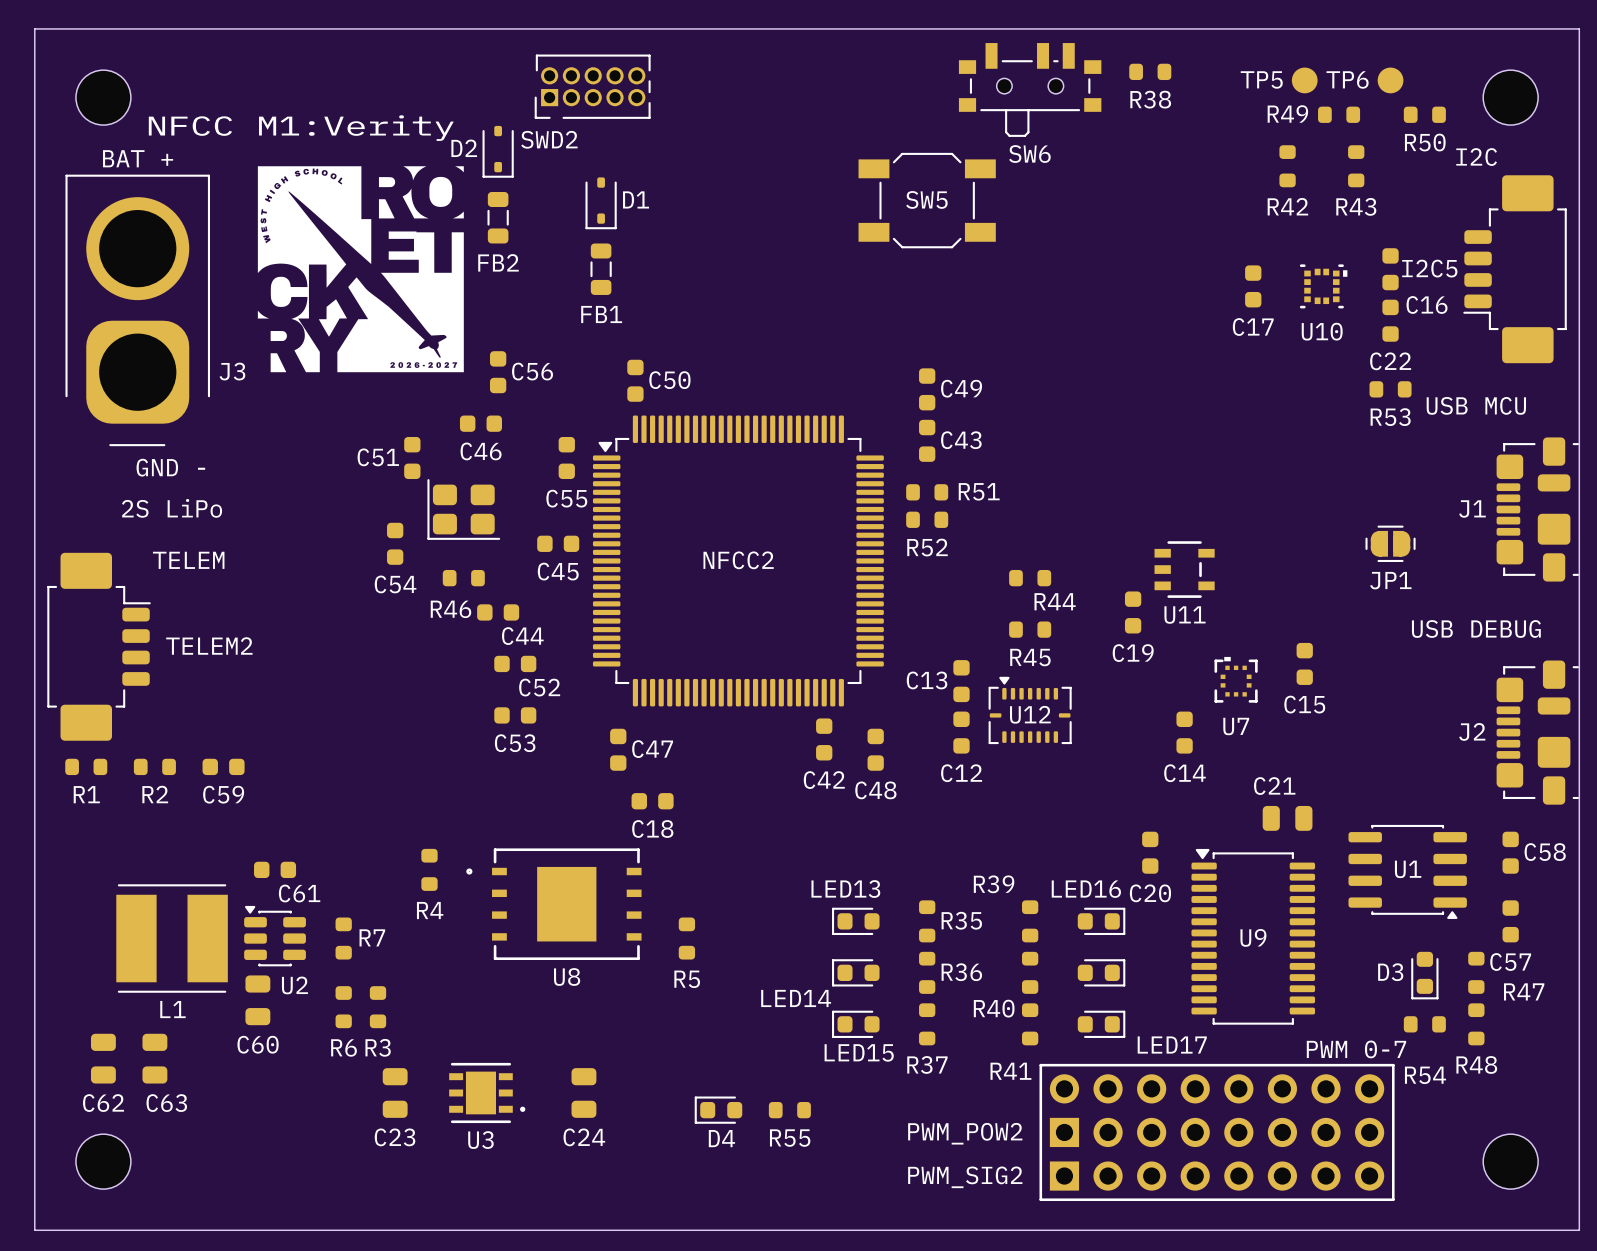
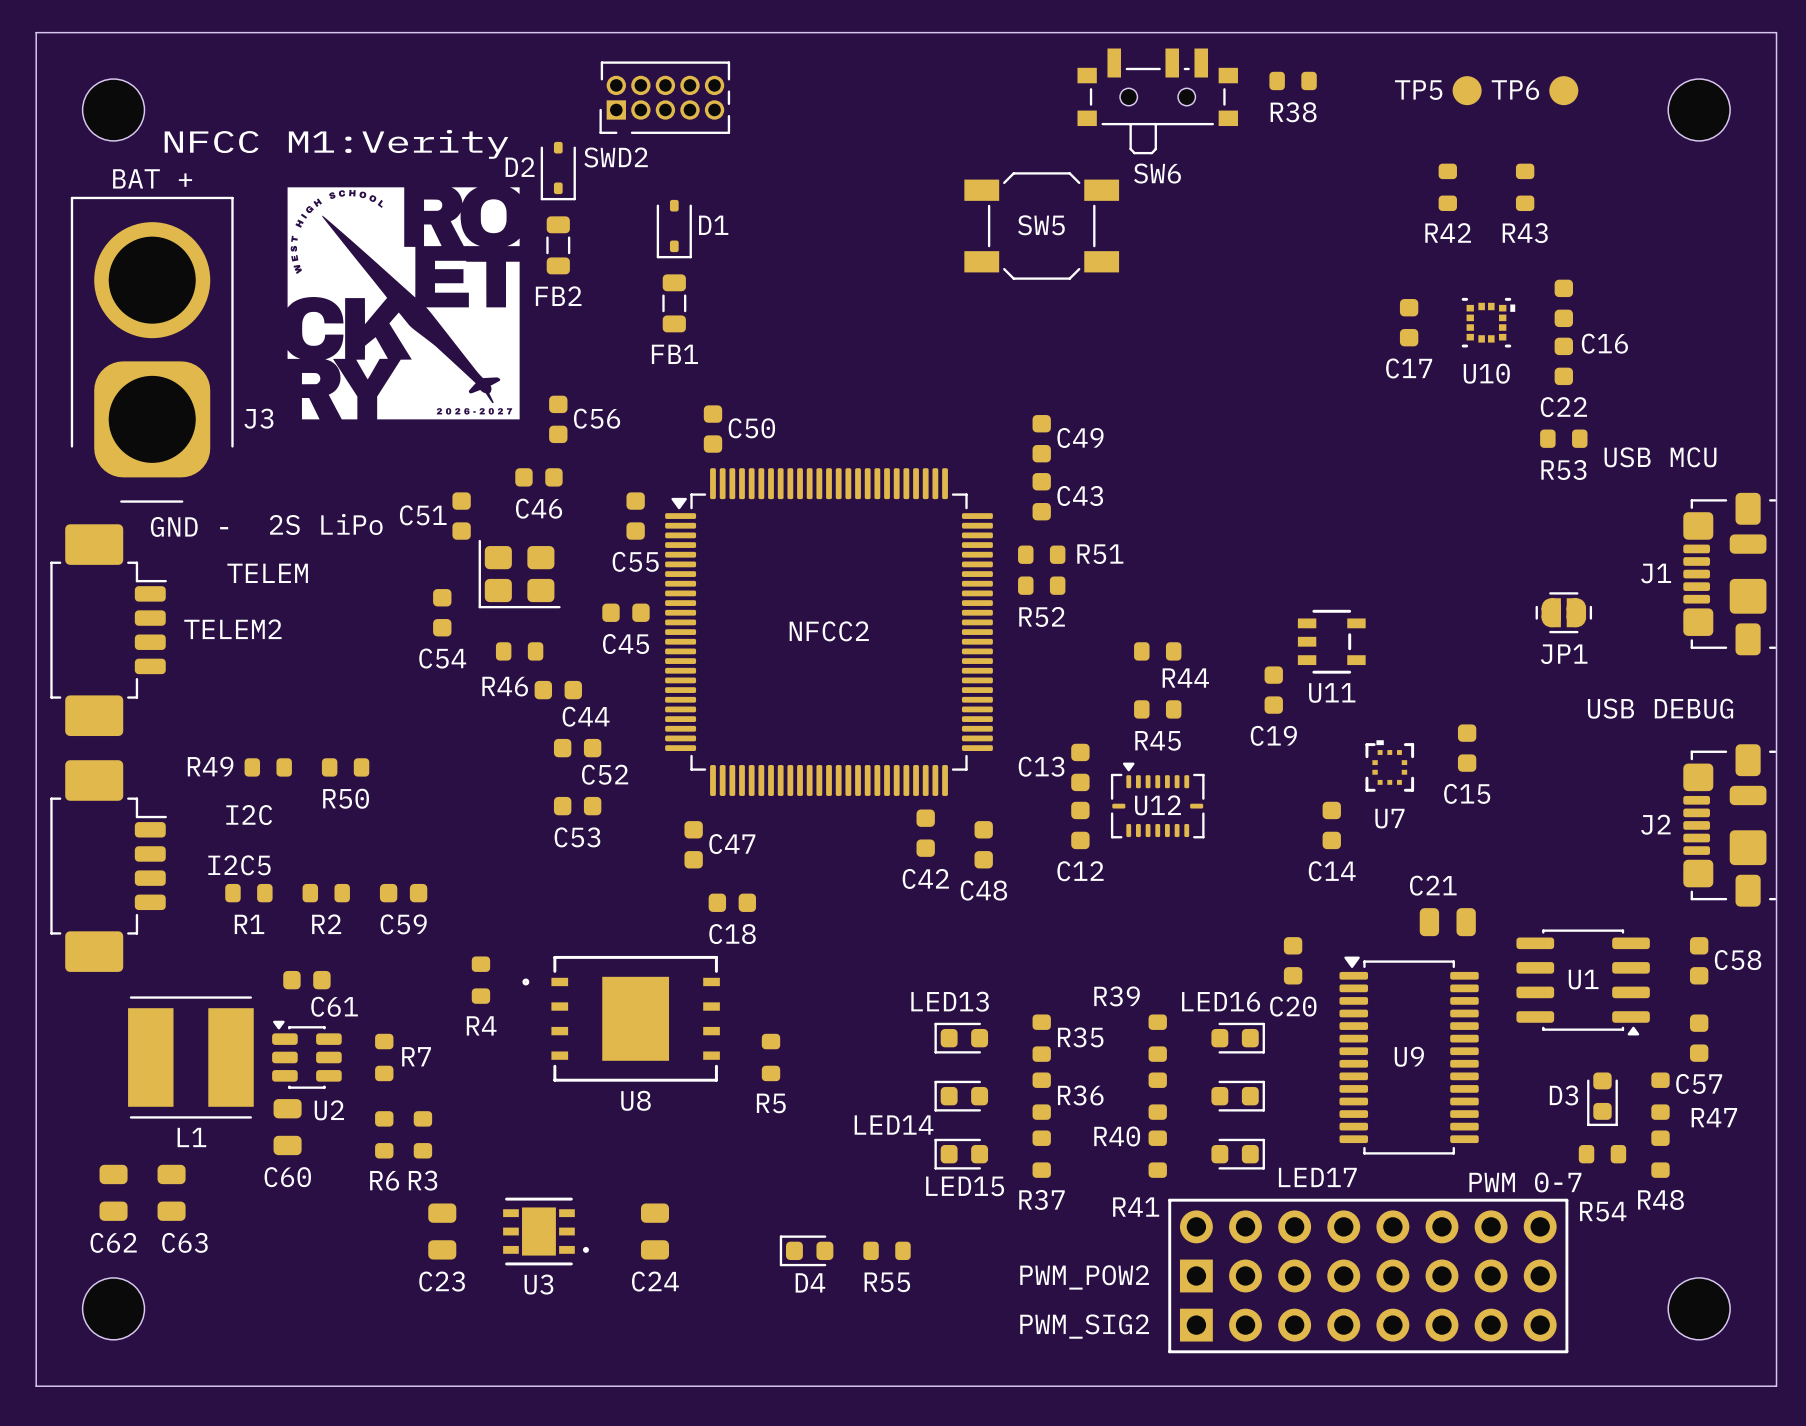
R49 position: (1339, 114) -> (268, 767)
R50 position: (1424, 114) -> (345, 767)
text: I2C (1476, 157) -> none
I2C5 rotation: 0° (1515, 269) -> 180° (108, 866)
I2C5 position: (1515, 269) -> (108, 866)
text position: 2S LiPo (172, 508) -> 2S LiPo (326, 524)
text position: TELEM (188, 560) -> TELEM (267, 573)
TELEM2 position: (99, 646) -> (108, 630)
text: none -> I2C (249, 815)
R1 position: (86, 766) -> (248, 893)
R2 position: (154, 766) -> (326, 893)
C59 position: (223, 766) -> (403, 893)

